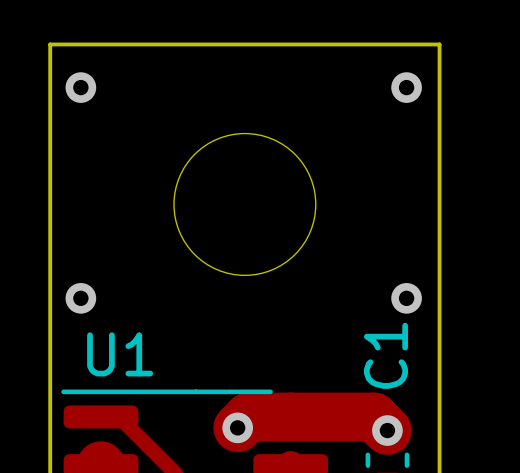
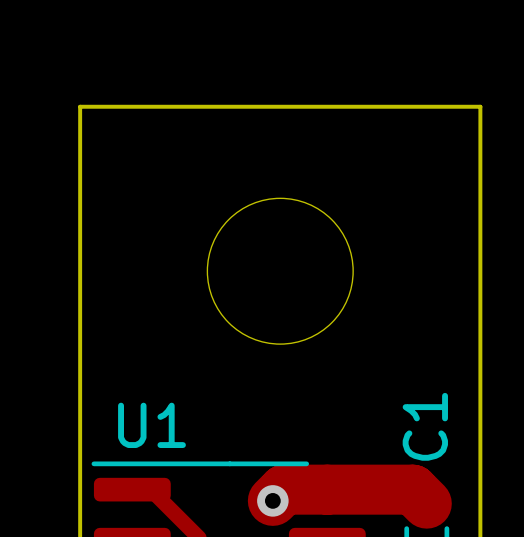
via: (80, 87) -> none
via: (406, 87) -> none
via: (80, 298) -> none
via: (406, 298) -> none
via: (387, 430) -> none

